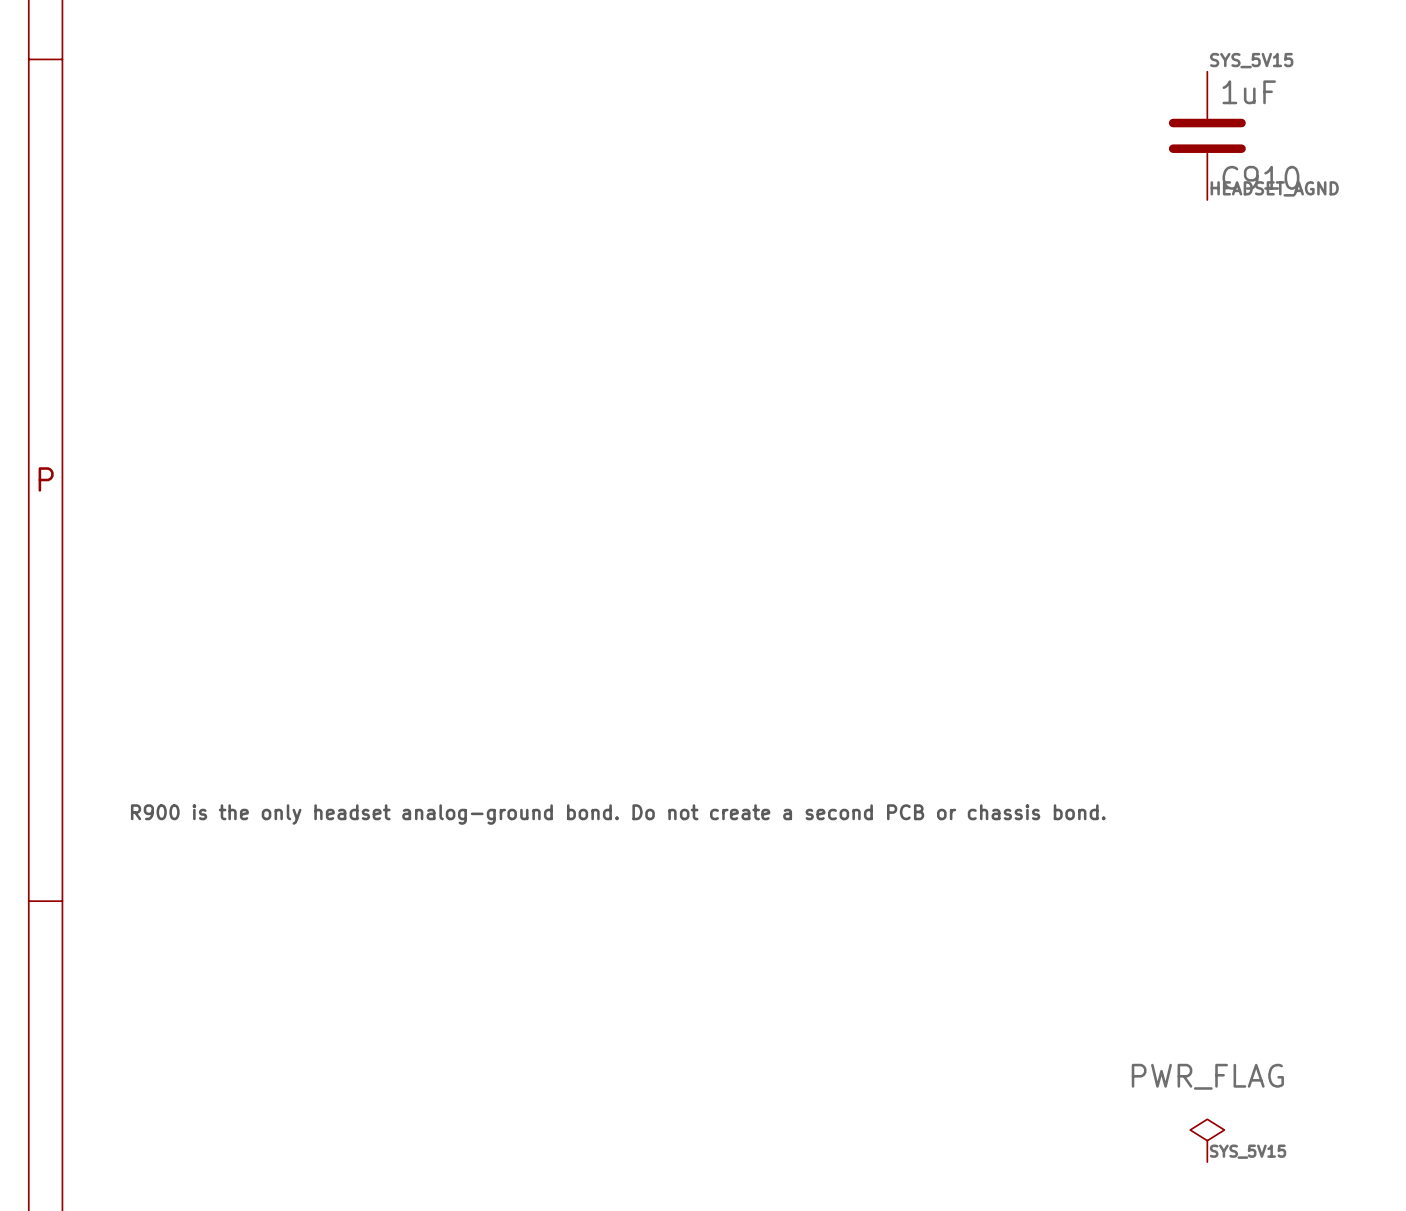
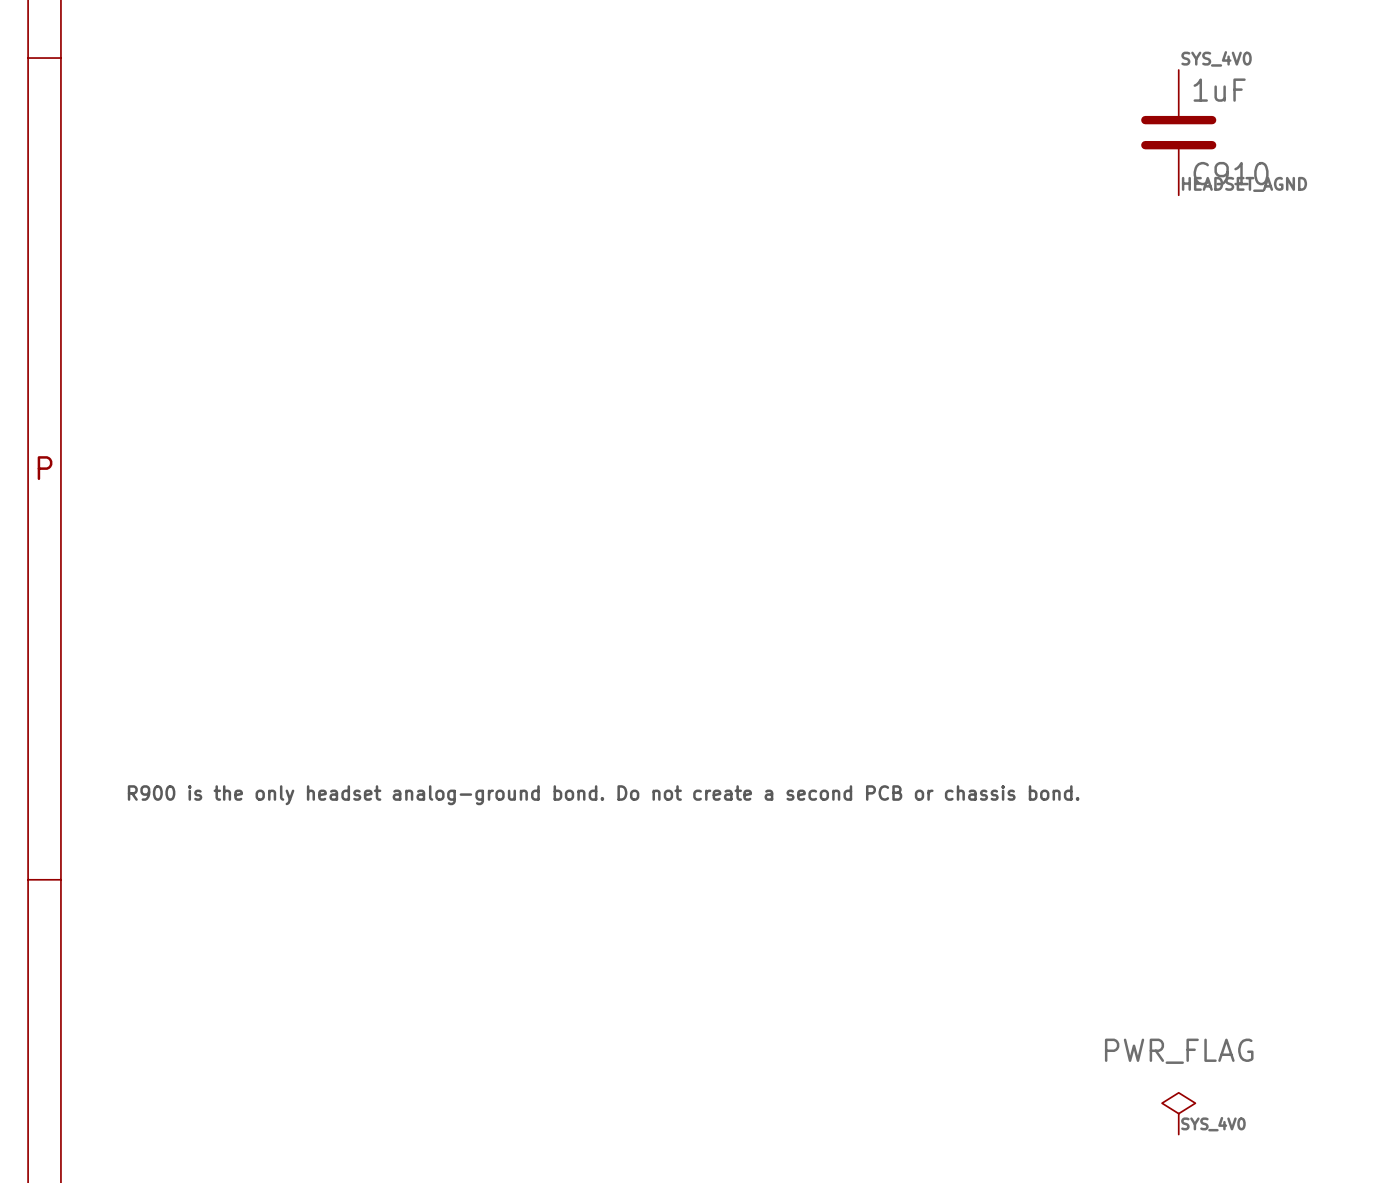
label: SYS_5V15 (1251, 60) -> SYS_4V0 (1216, 58)
label: SYS_5V15 (1248, 1151) -> SYS_4V0 (1213, 1124)

